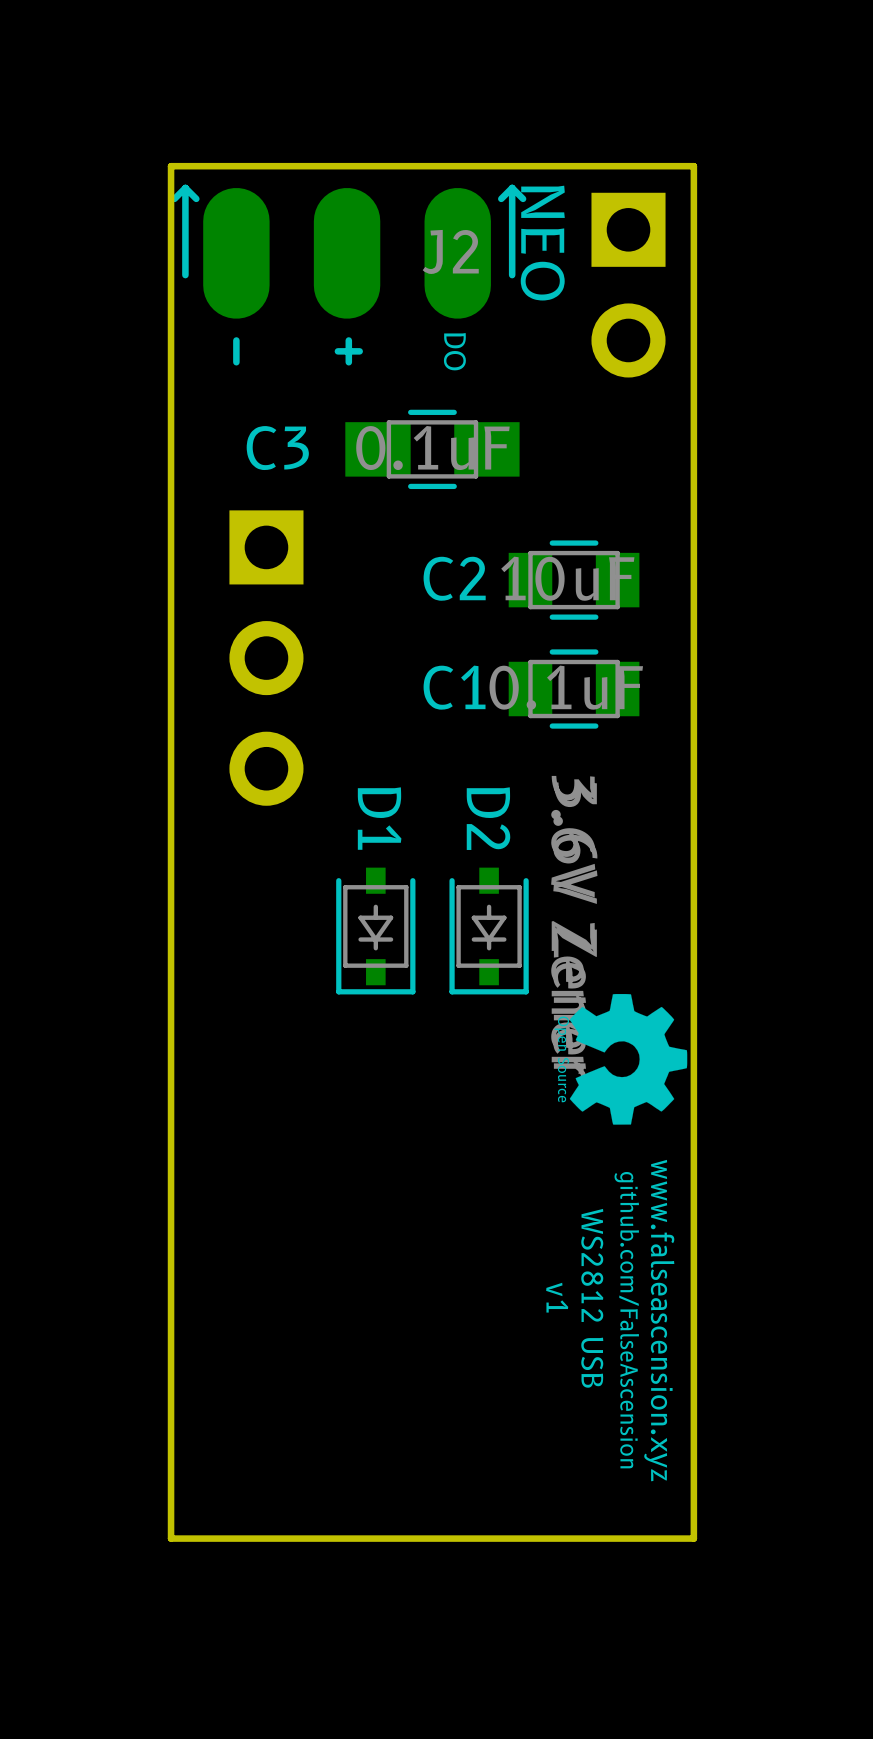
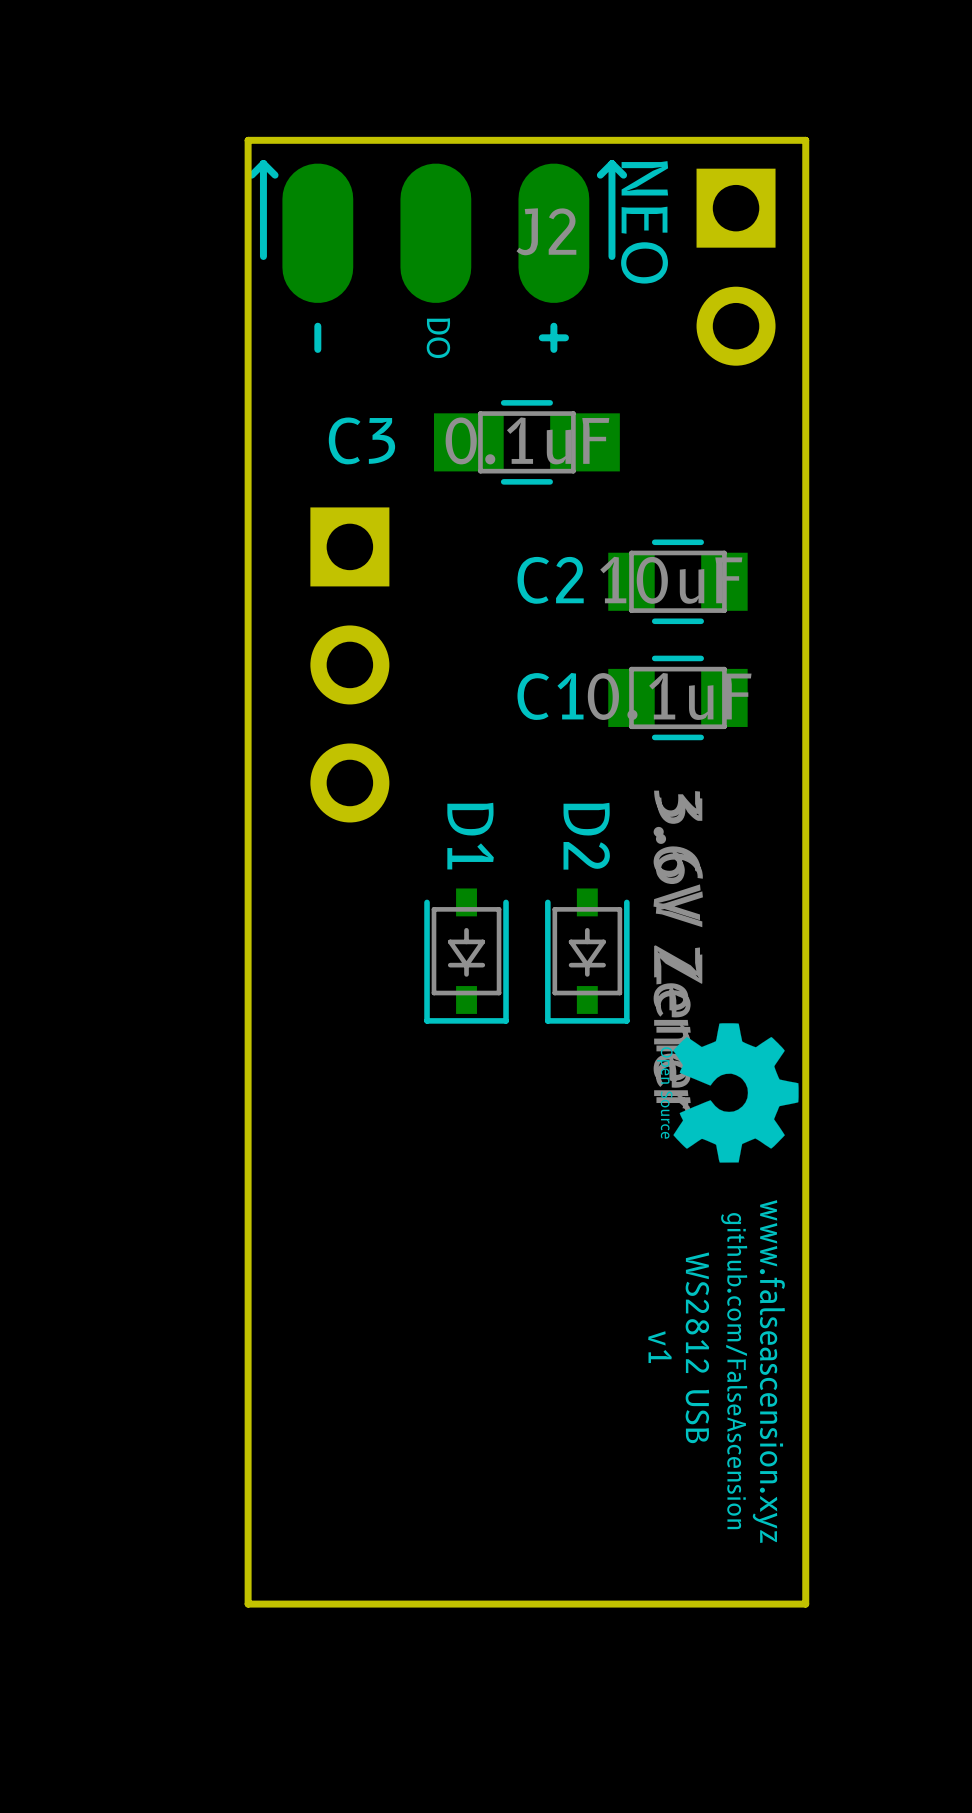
J2 footprint: [171, 184, 527, 366] -> [248, 160, 628, 353]

